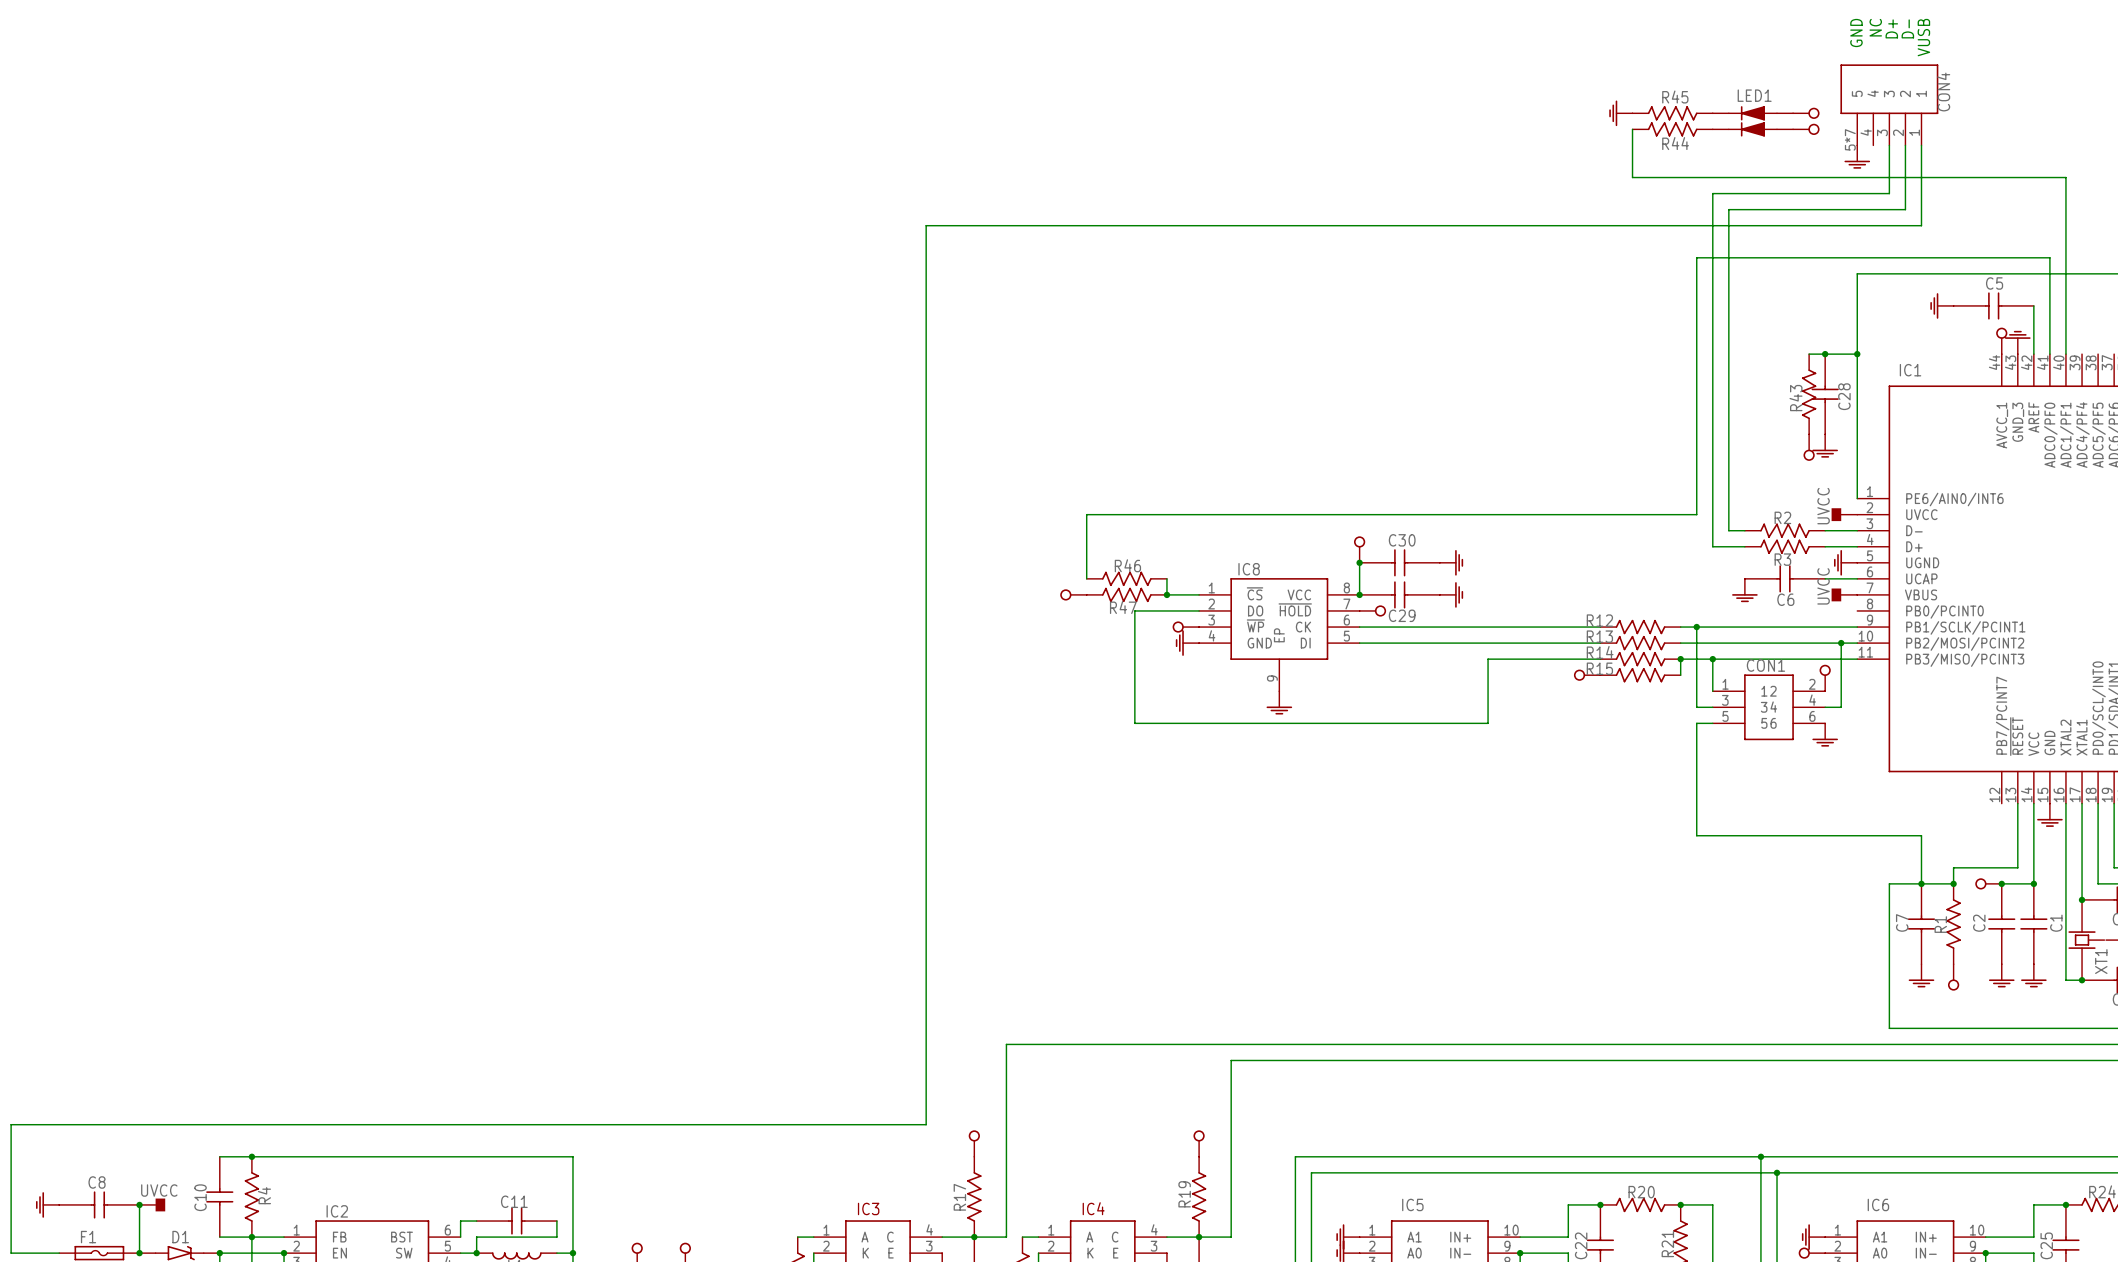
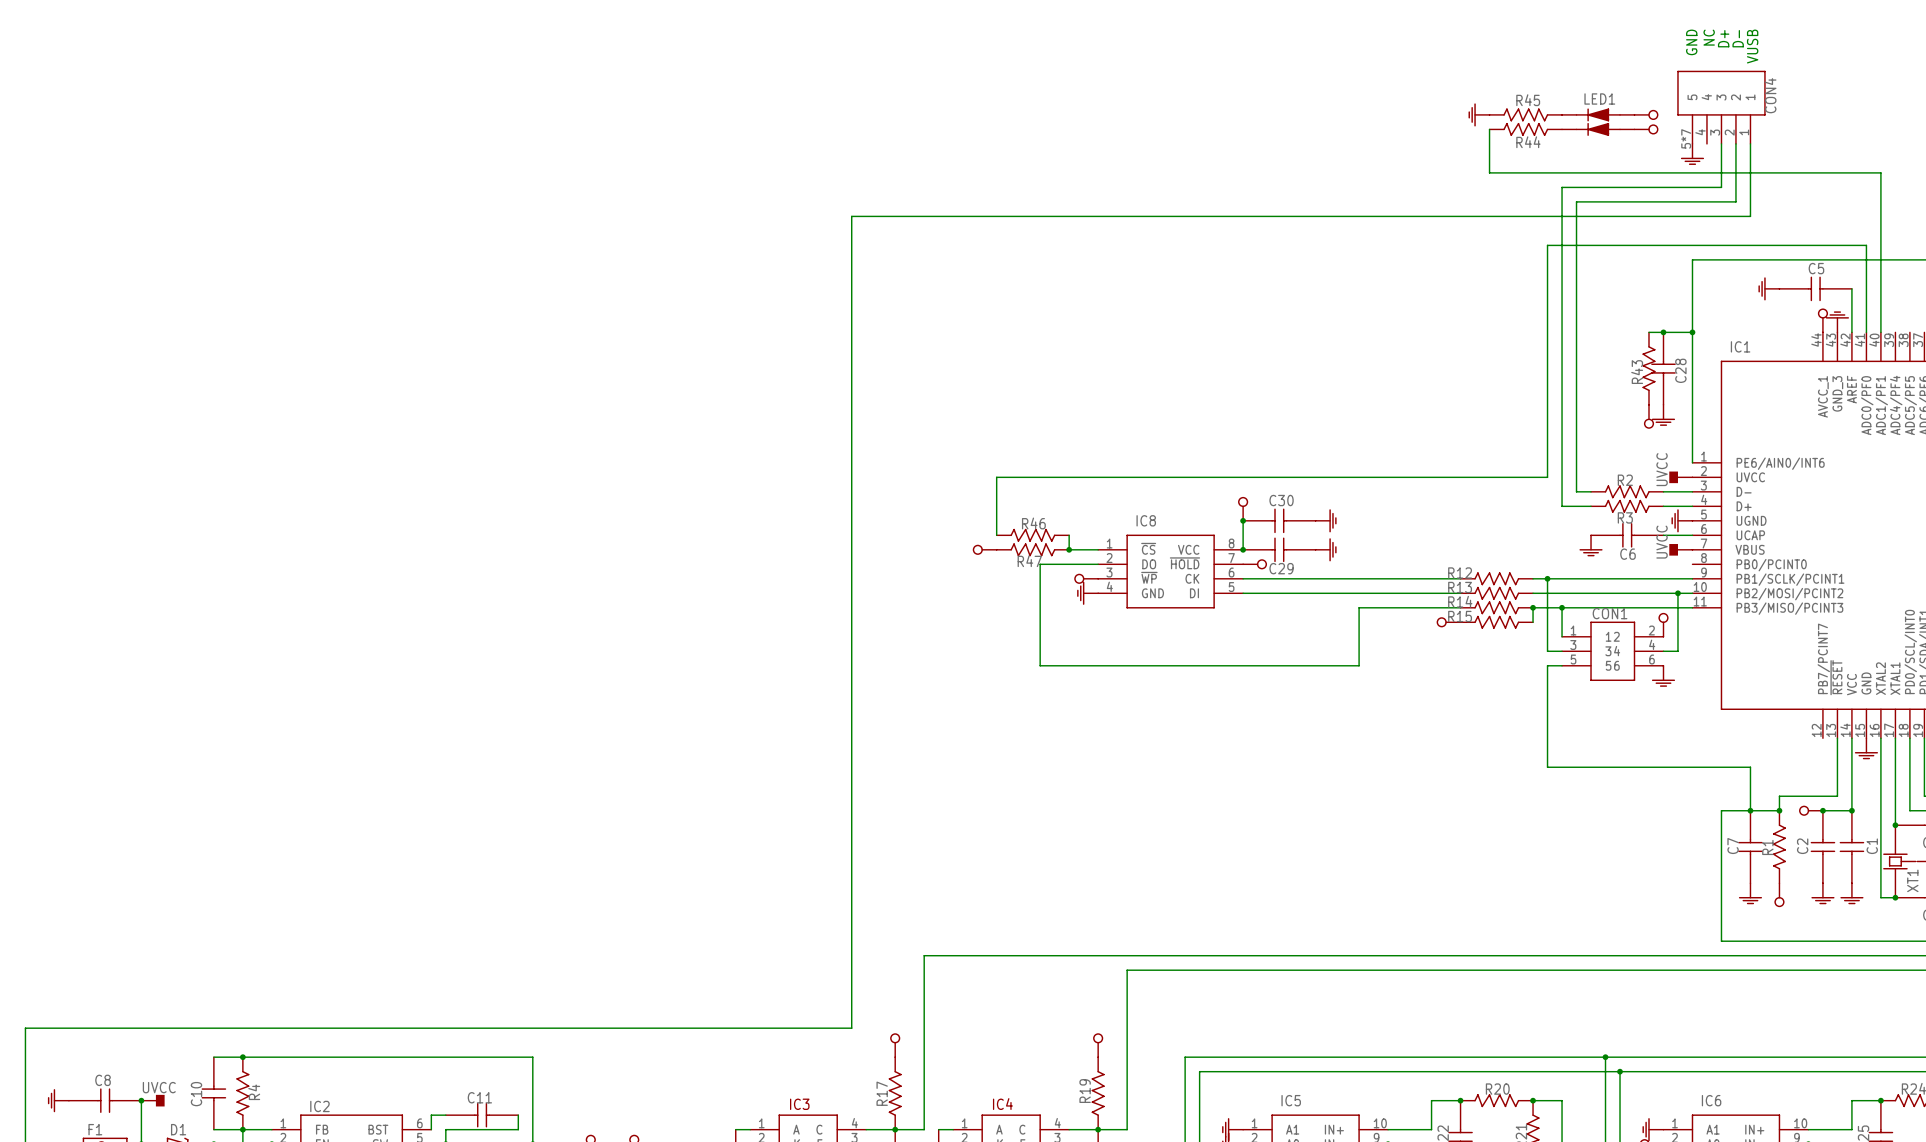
IC8 symbol: [1199, 578, 1360, 692] -> [1098, 534, 1244, 609]
power symbol: (1279, 702) -> none

